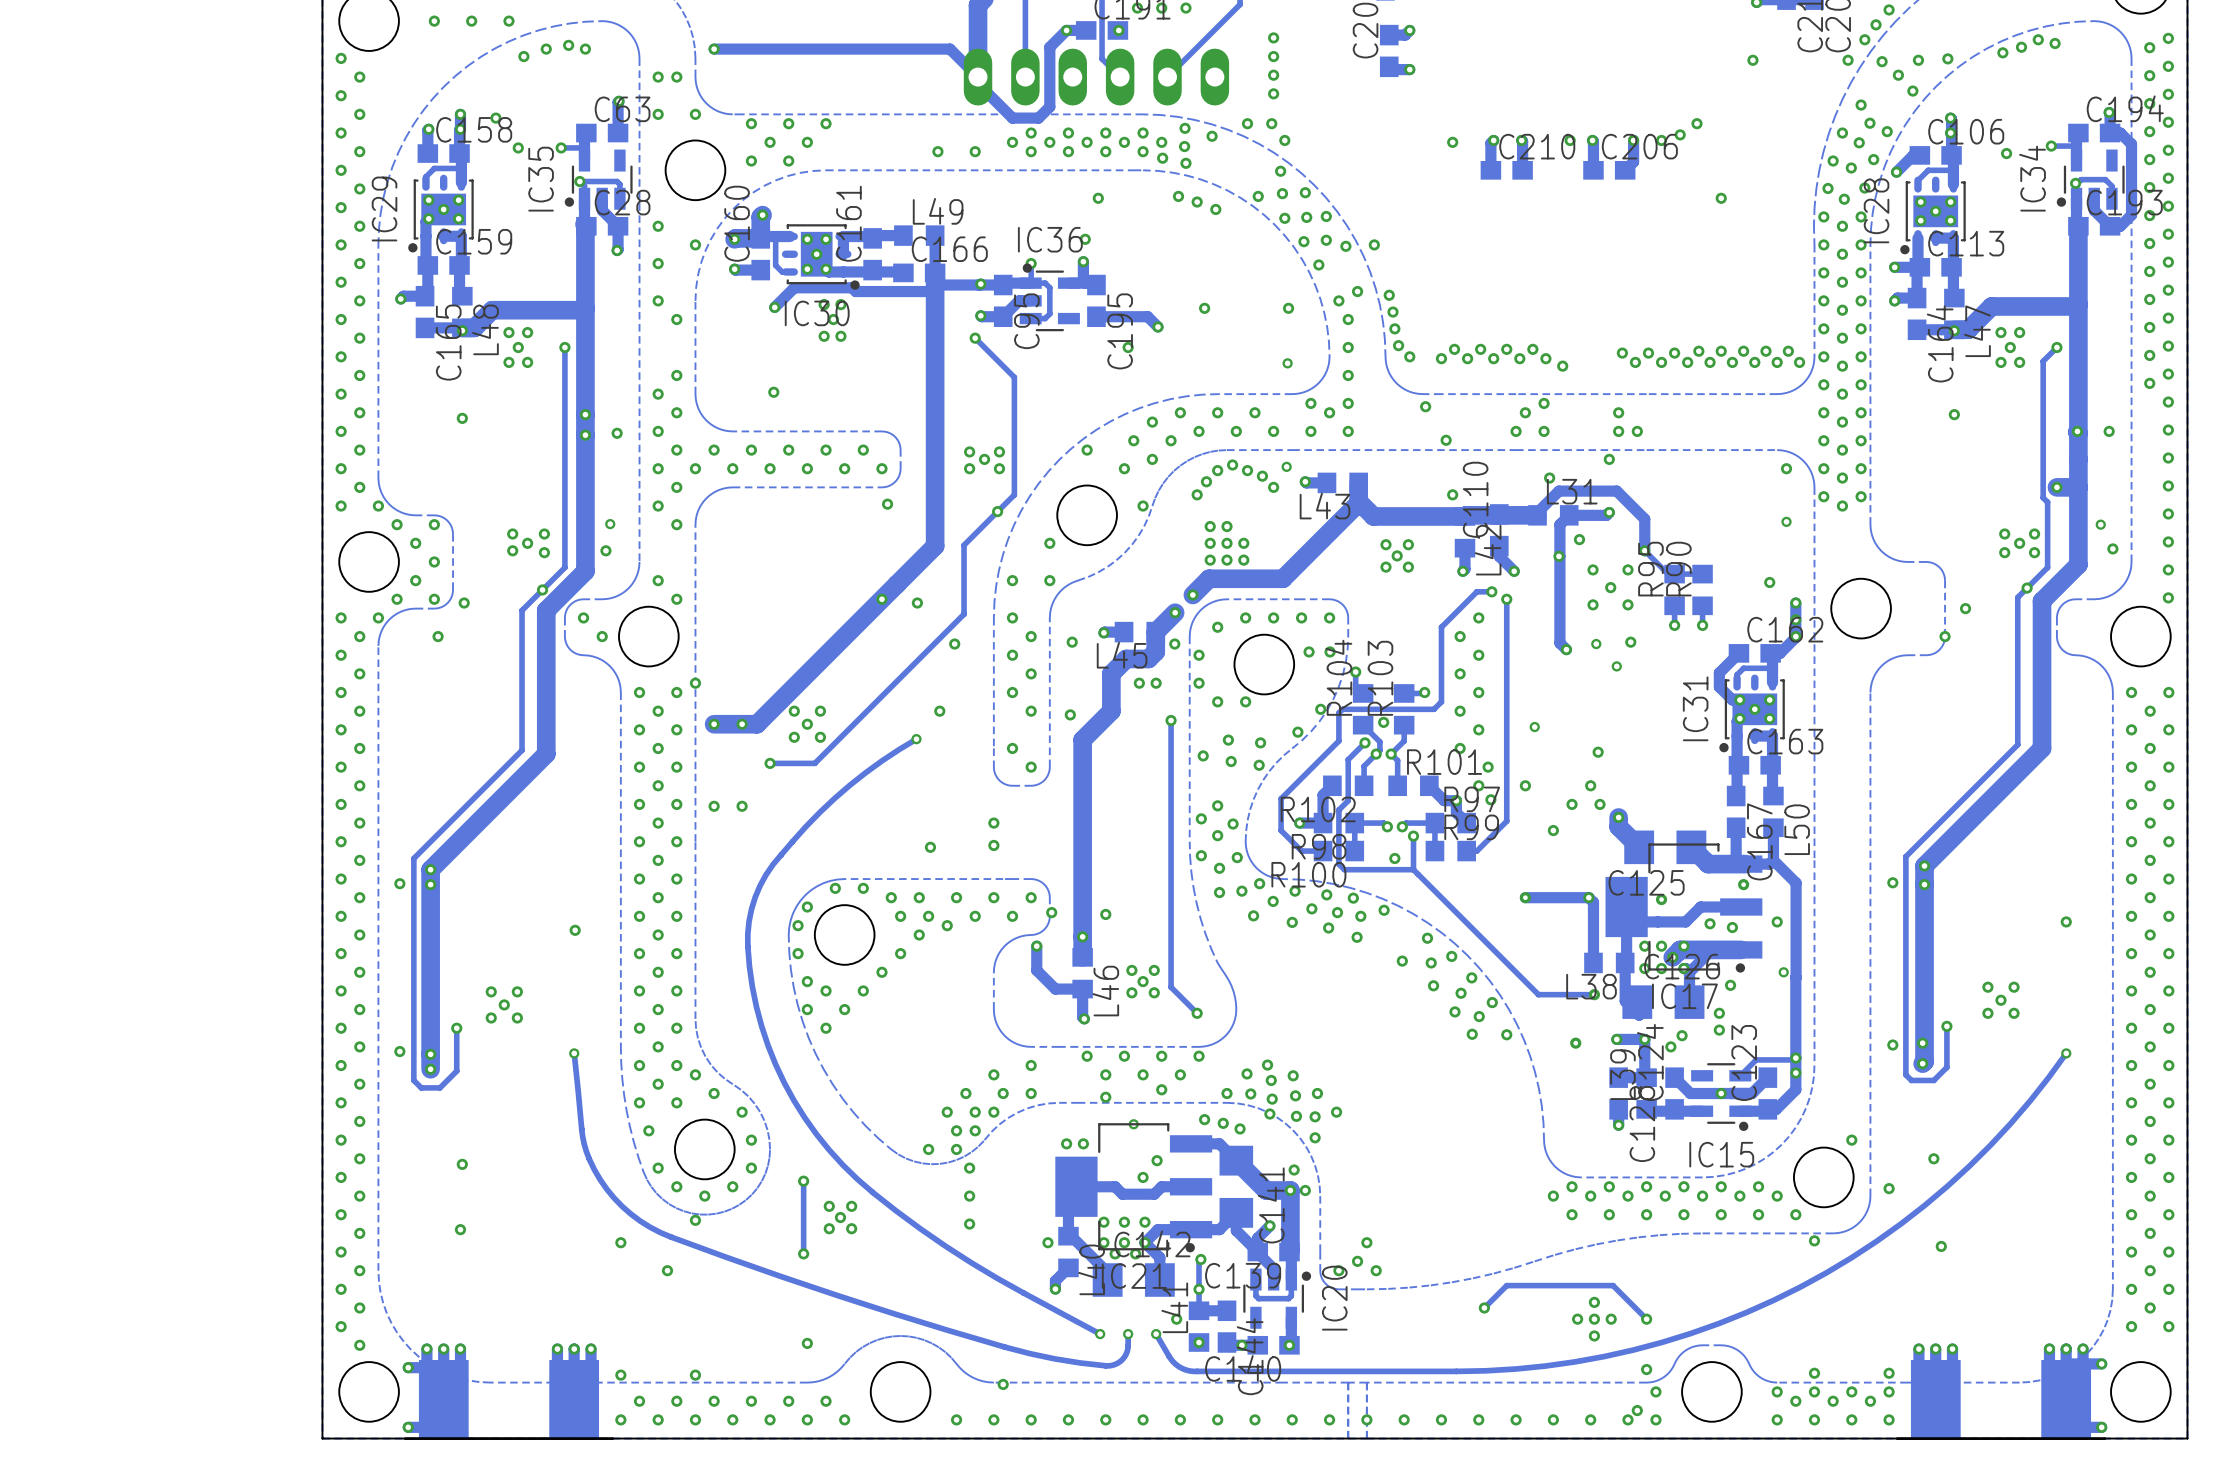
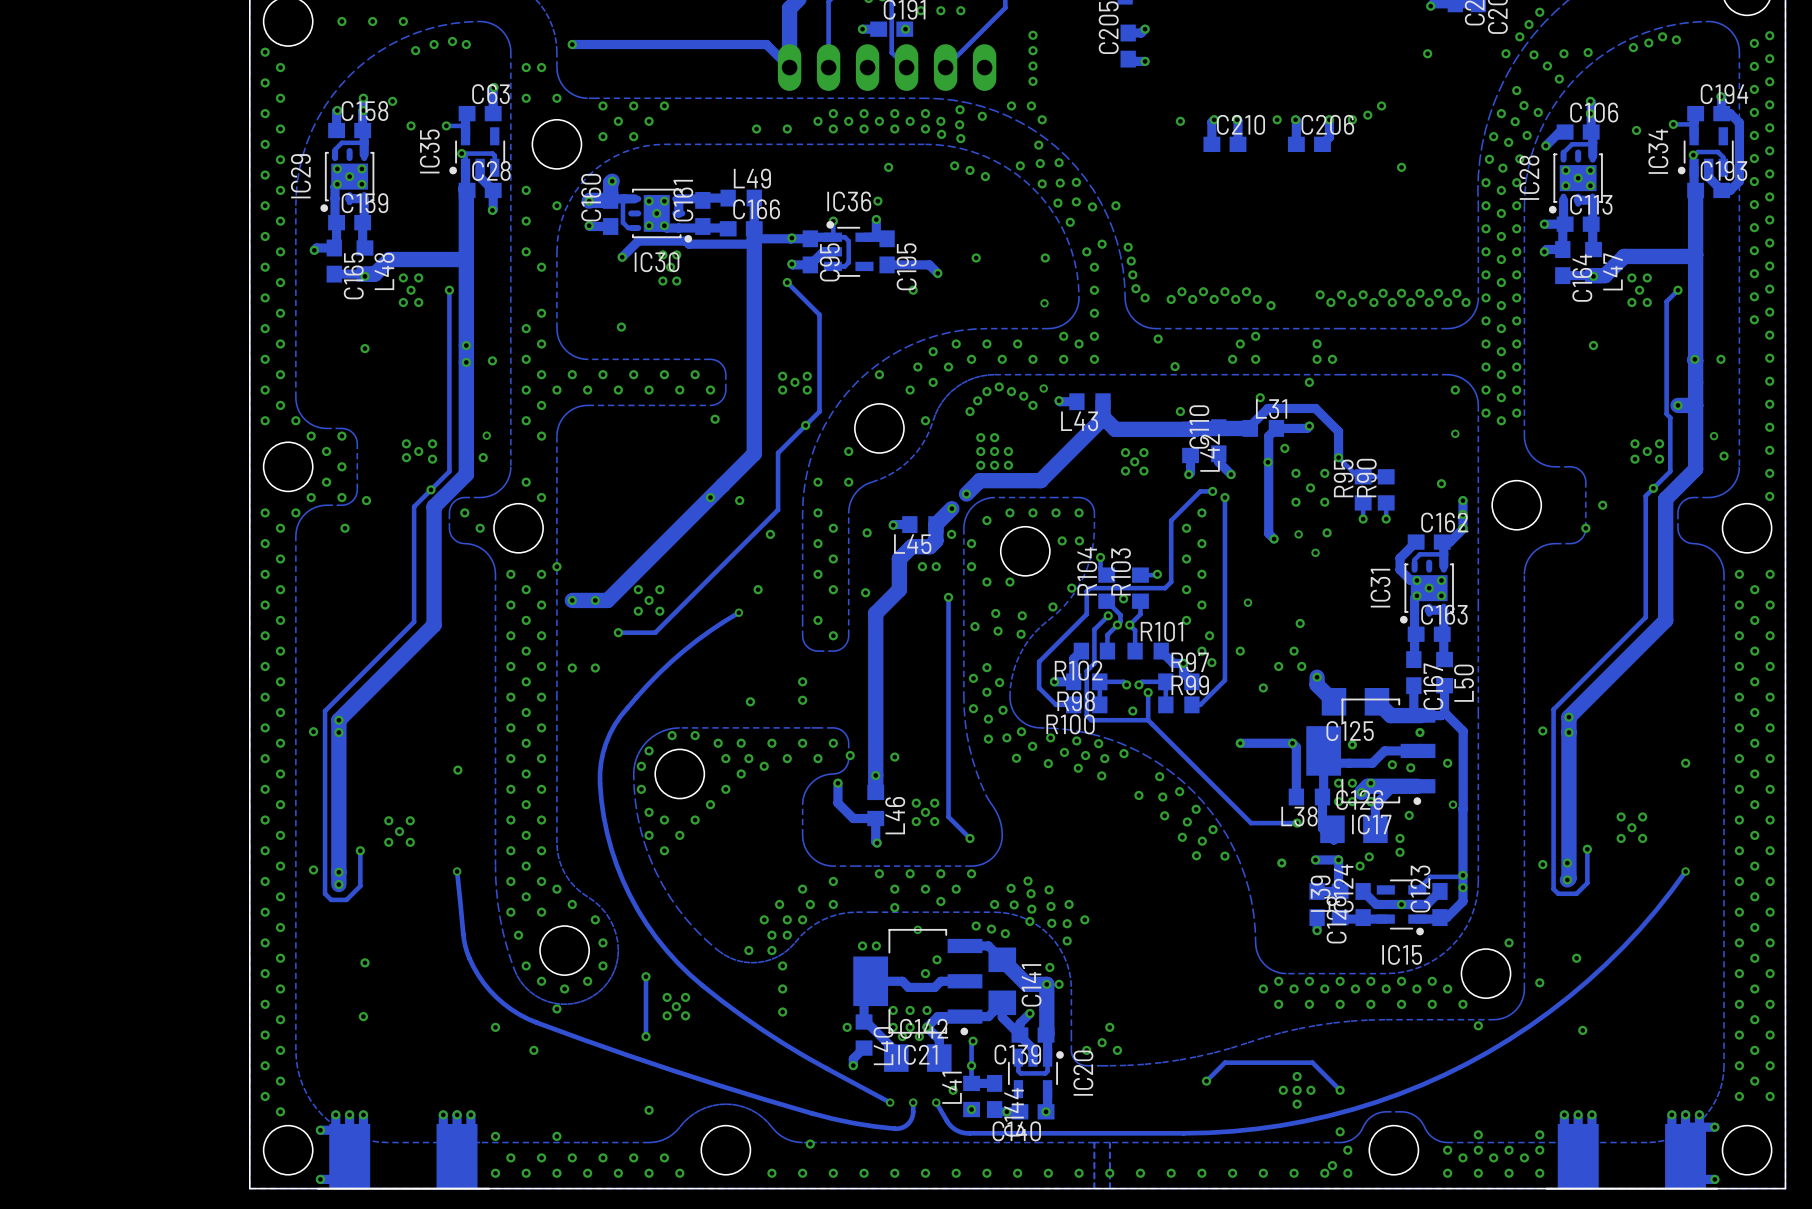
track: (1066, 30) (1049, 47) (1049, 106) (1038, 118) (1012, 118) (978, 83) -> none

